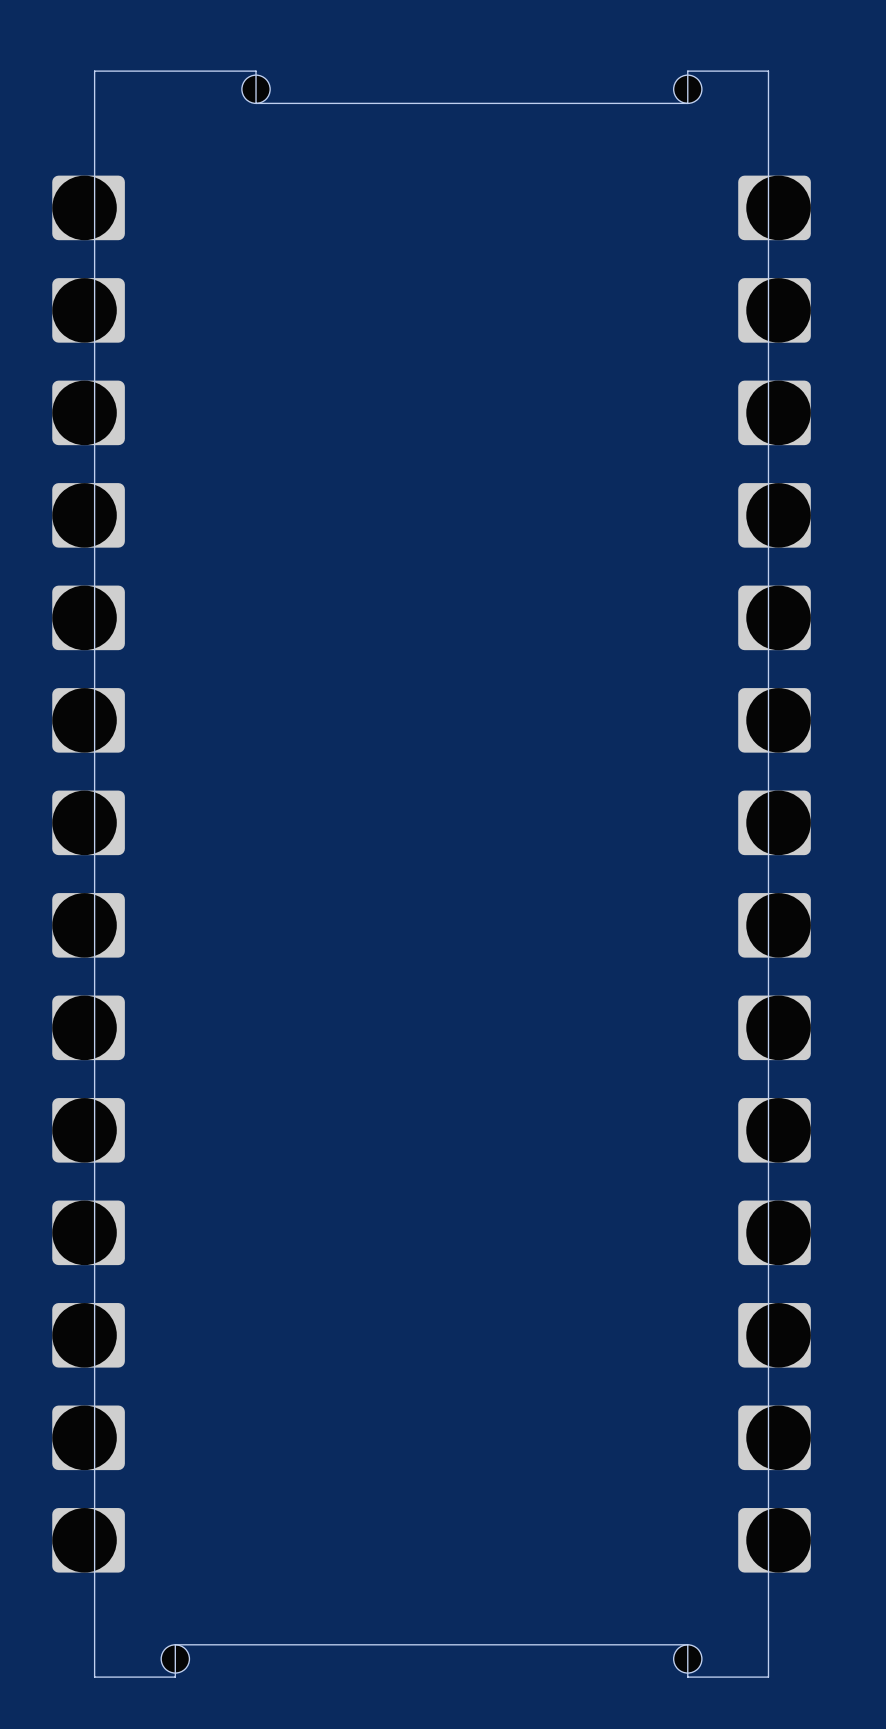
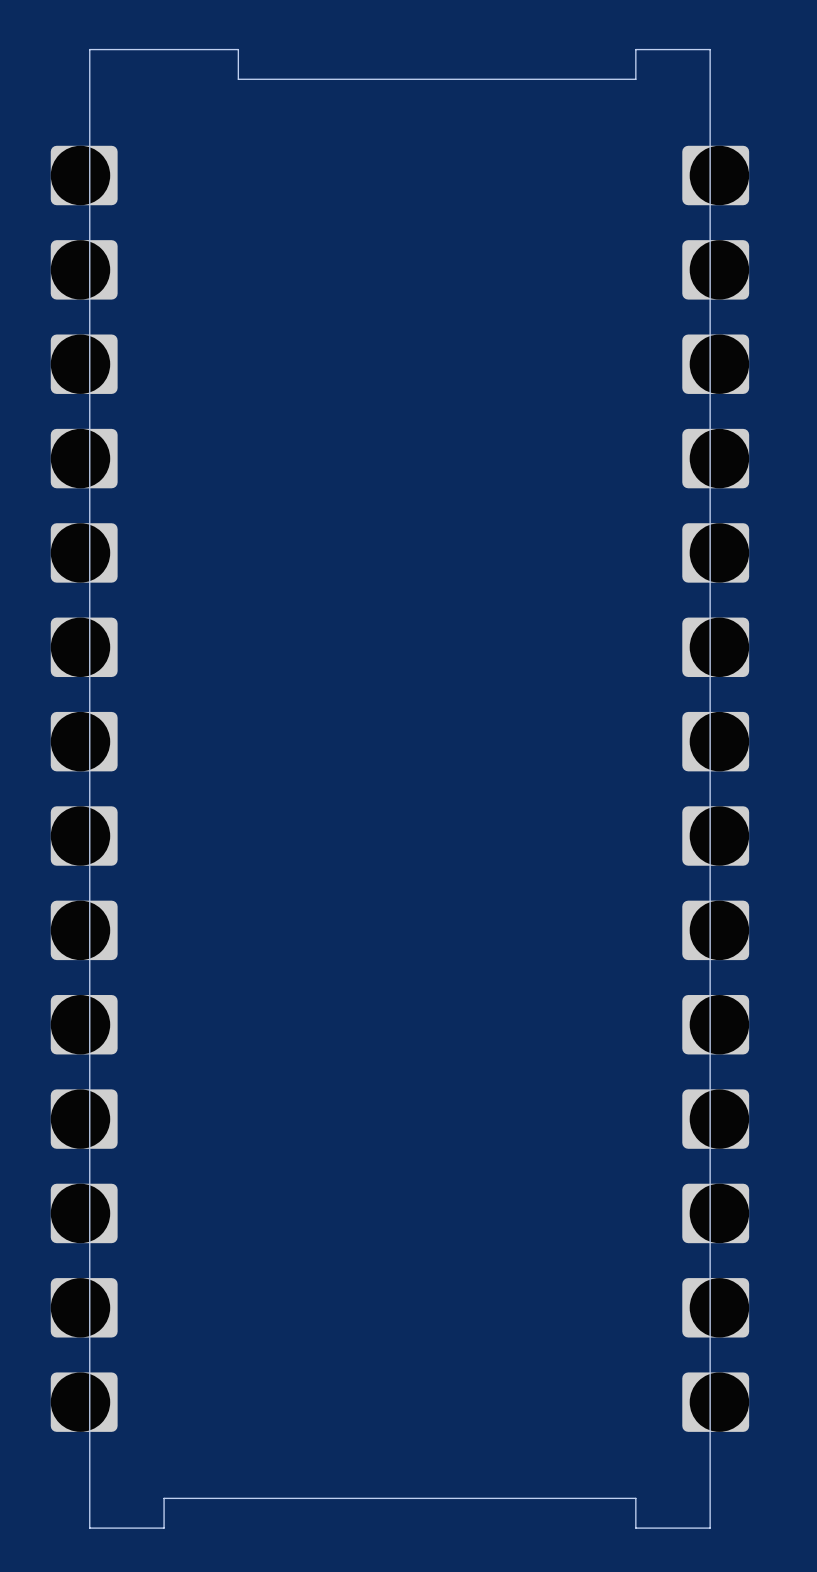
part: (256, 89) -> none
part: (687, 89) -> none
part: (175, 1658) -> none
part: (687, 1658) -> none

